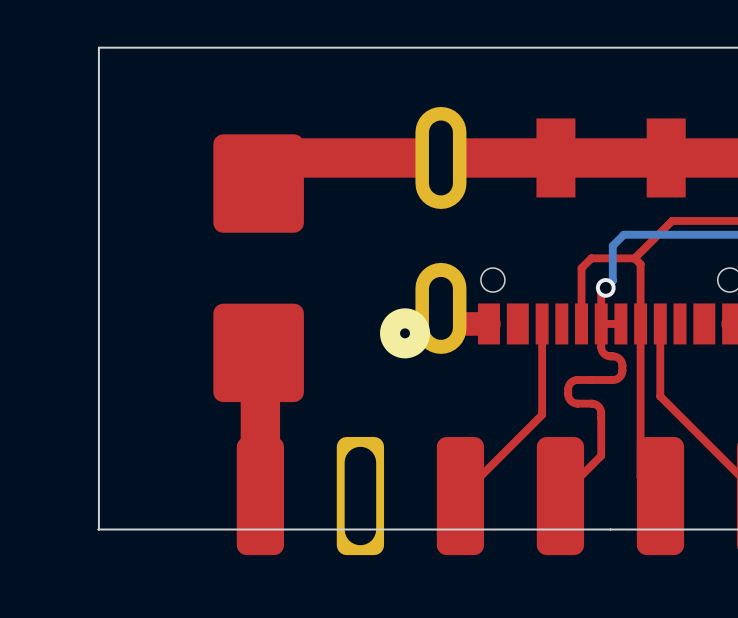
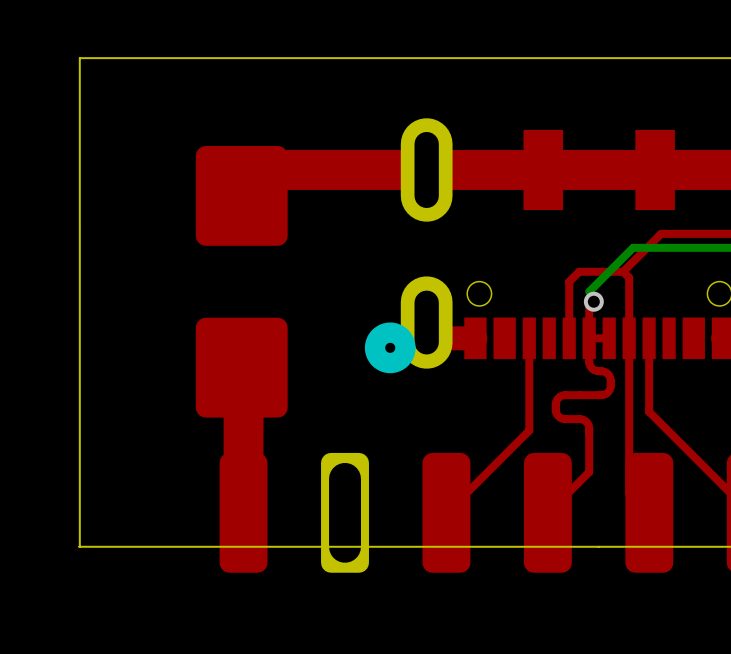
bottom track: (644, 234) (623, 234) (612, 245) (612, 280) (605, 287) -> (633, 247) (589, 291)

